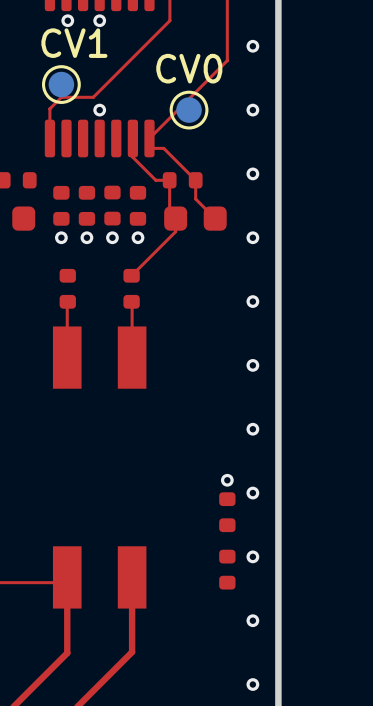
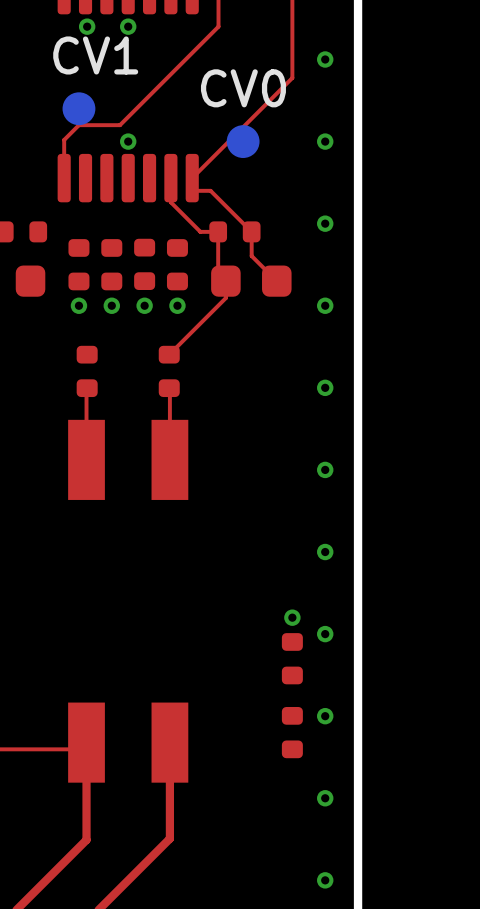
part footprint: [41, 65, 81, 104] -> [62, 92, 96, 126]
part footprint: [169, 90, 209, 130] -> [226, 125, 260, 159]

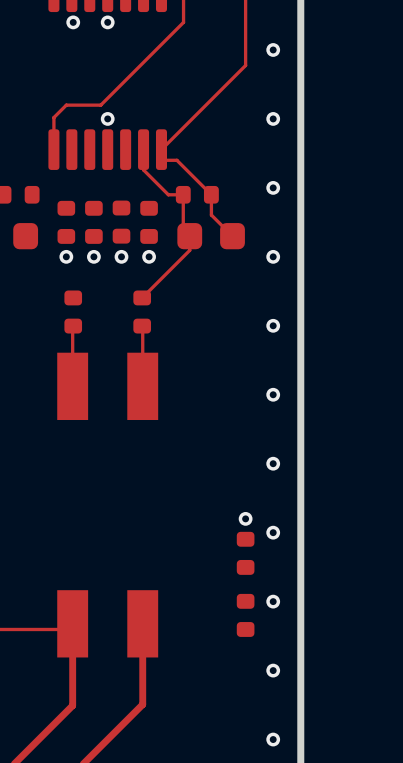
text: CV1 (95, 55) -> none
text: CV0 (243, 88) -> none
part: (78, 108) -> none
part: (243, 141) -> none

